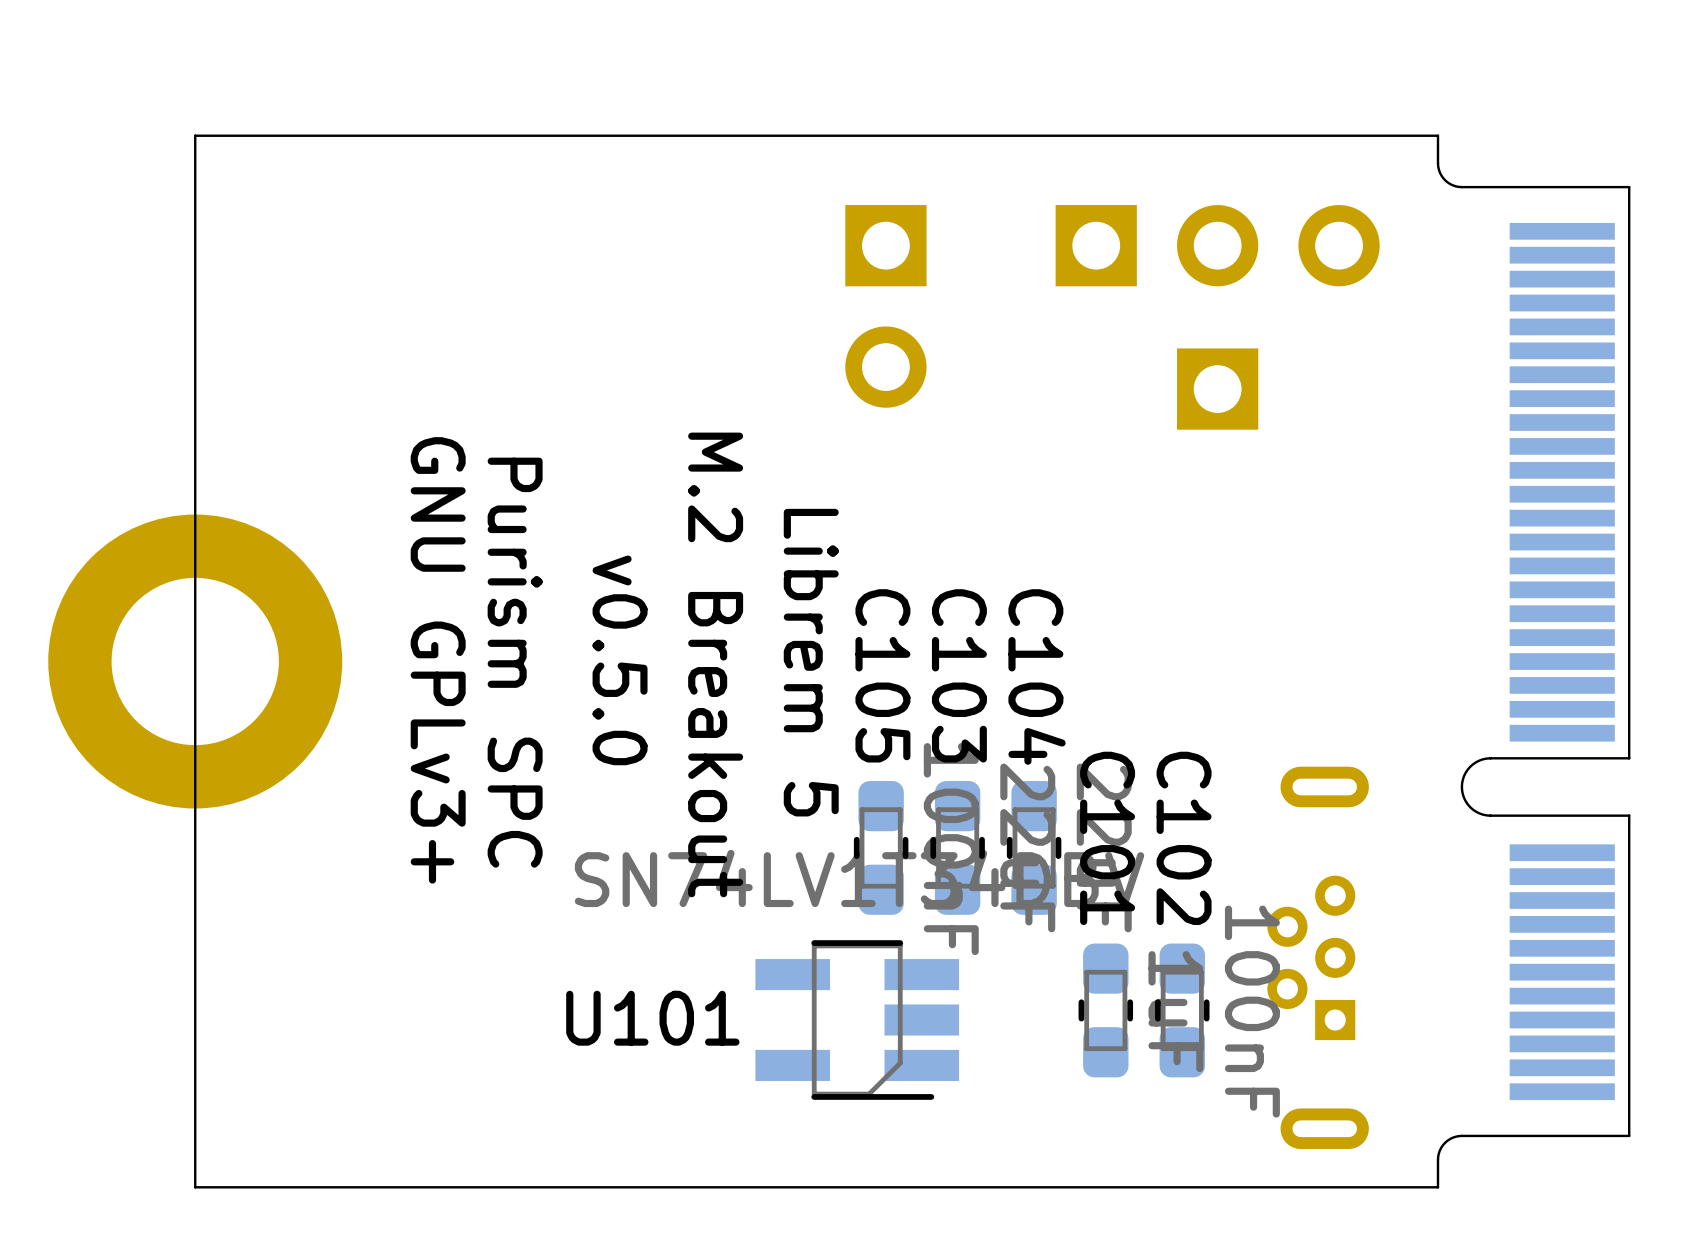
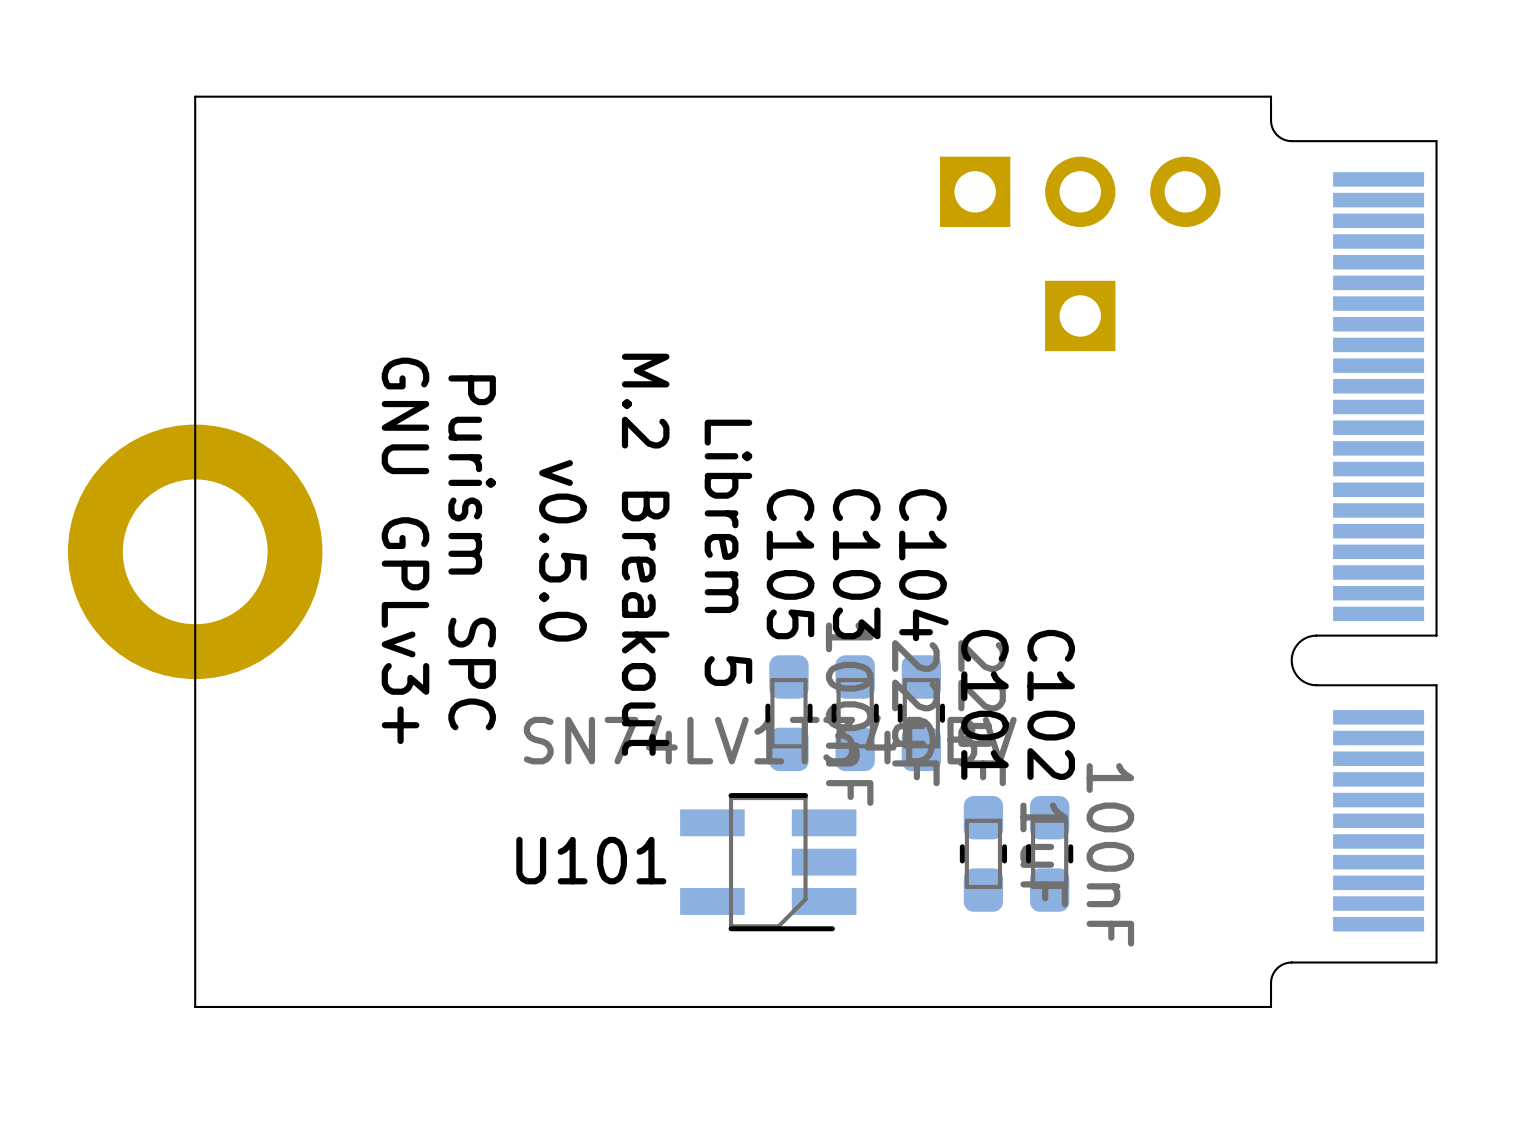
part: (885, 306) -> none
part: (1318, 957) -> none

